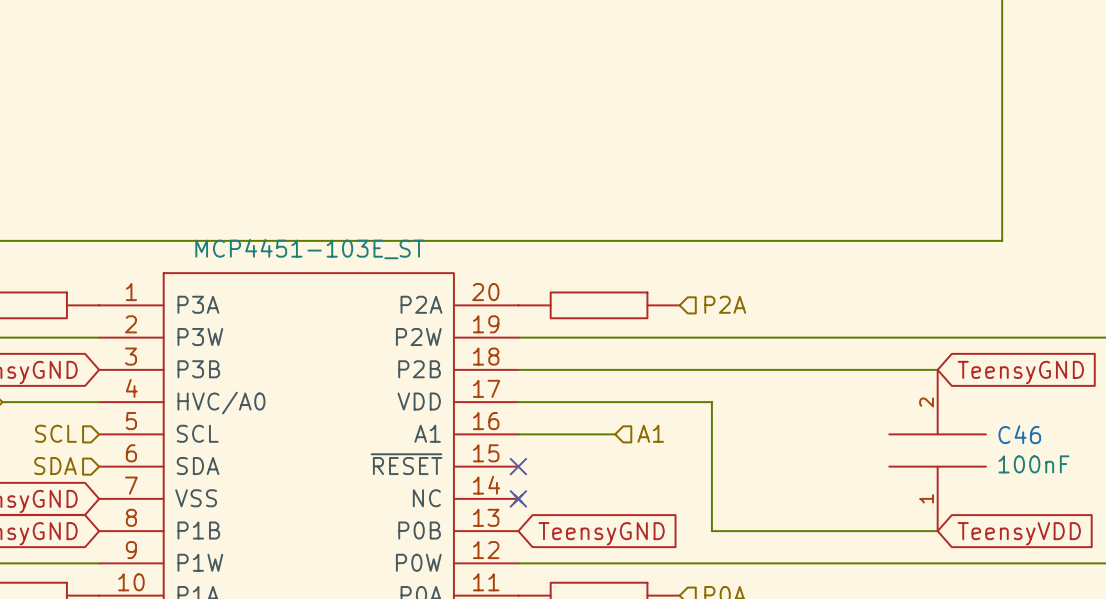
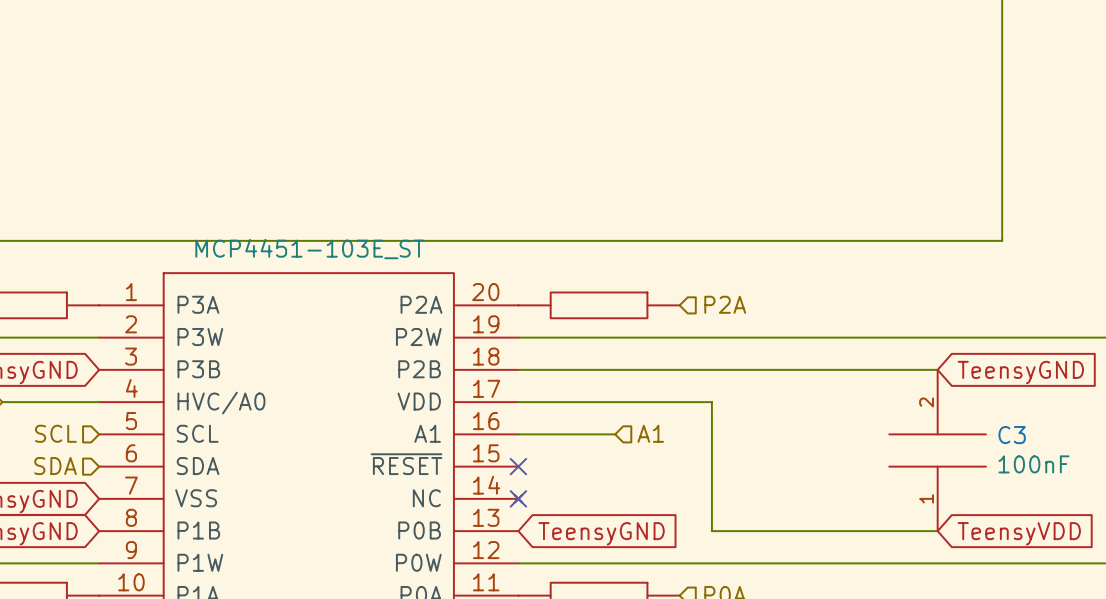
C46 name: C46 (1019, 434) -> C3 (1012, 435)

